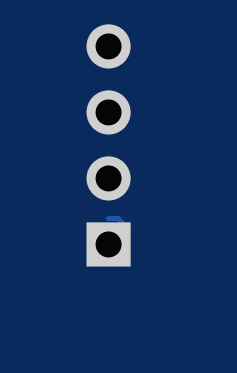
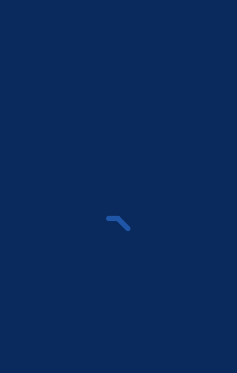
part: (108, 145) -> none

